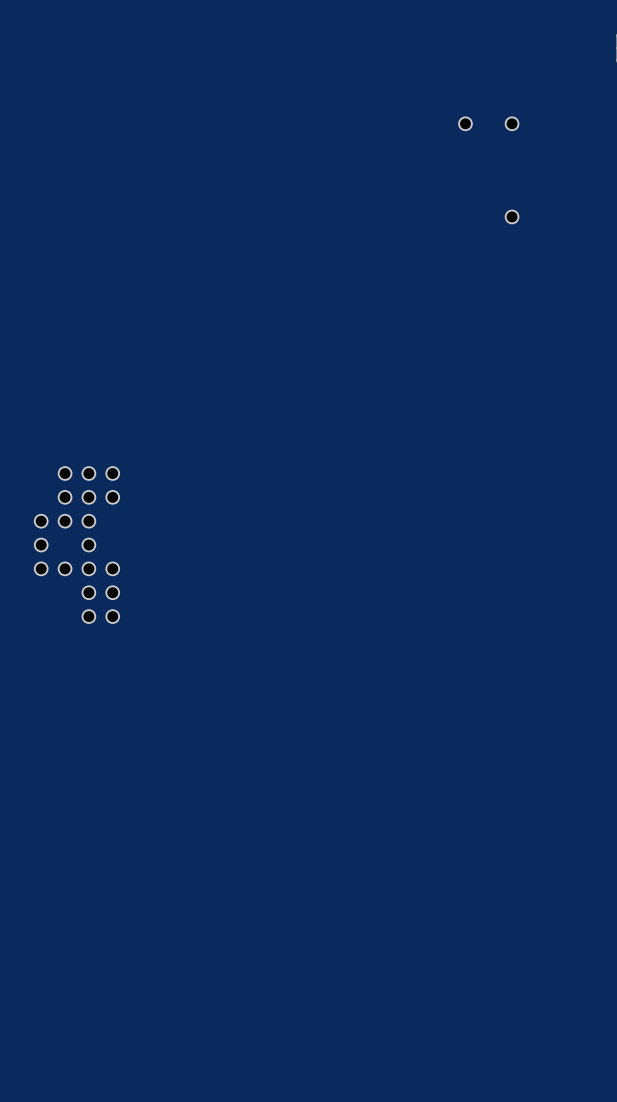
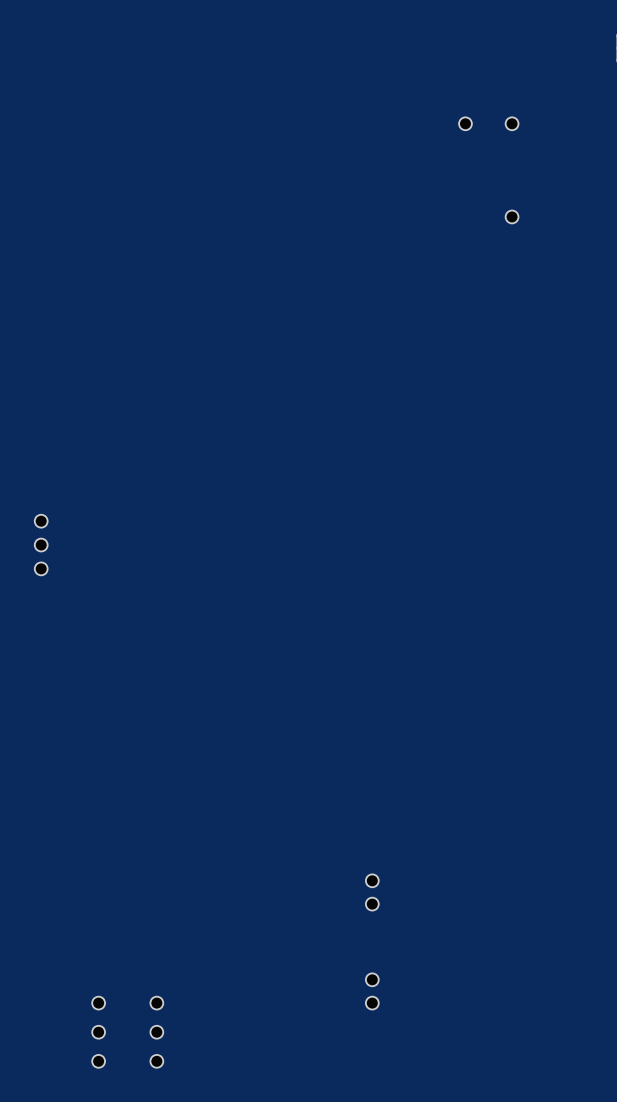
part: (65, 473) -> none
part: (88, 473) -> none
part: (112, 473) -> none
part: (65, 497) -> none
part: (88, 497) -> none
part: (112, 497) -> none
part: (65, 521) -> none
part: (88, 521) -> none
part: (88, 545) -> none
part: (65, 568) -> none
part: (88, 568) -> none
part: (112, 568) -> none
part: (88, 592) -> none
part: (112, 592) -> none
part: (88, 616) -> none
part: (112, 616) -> none
part: none -> (372, 880)
part: none -> (372, 904)
part: none -> (372, 979)
part: none -> (98, 1003)
part: none -> (156, 1003)
part: none -> (372, 1003)
part: none -> (98, 1032)
part: none -> (156, 1032)
part: none -> (98, 1061)
part: none -> (156, 1061)

